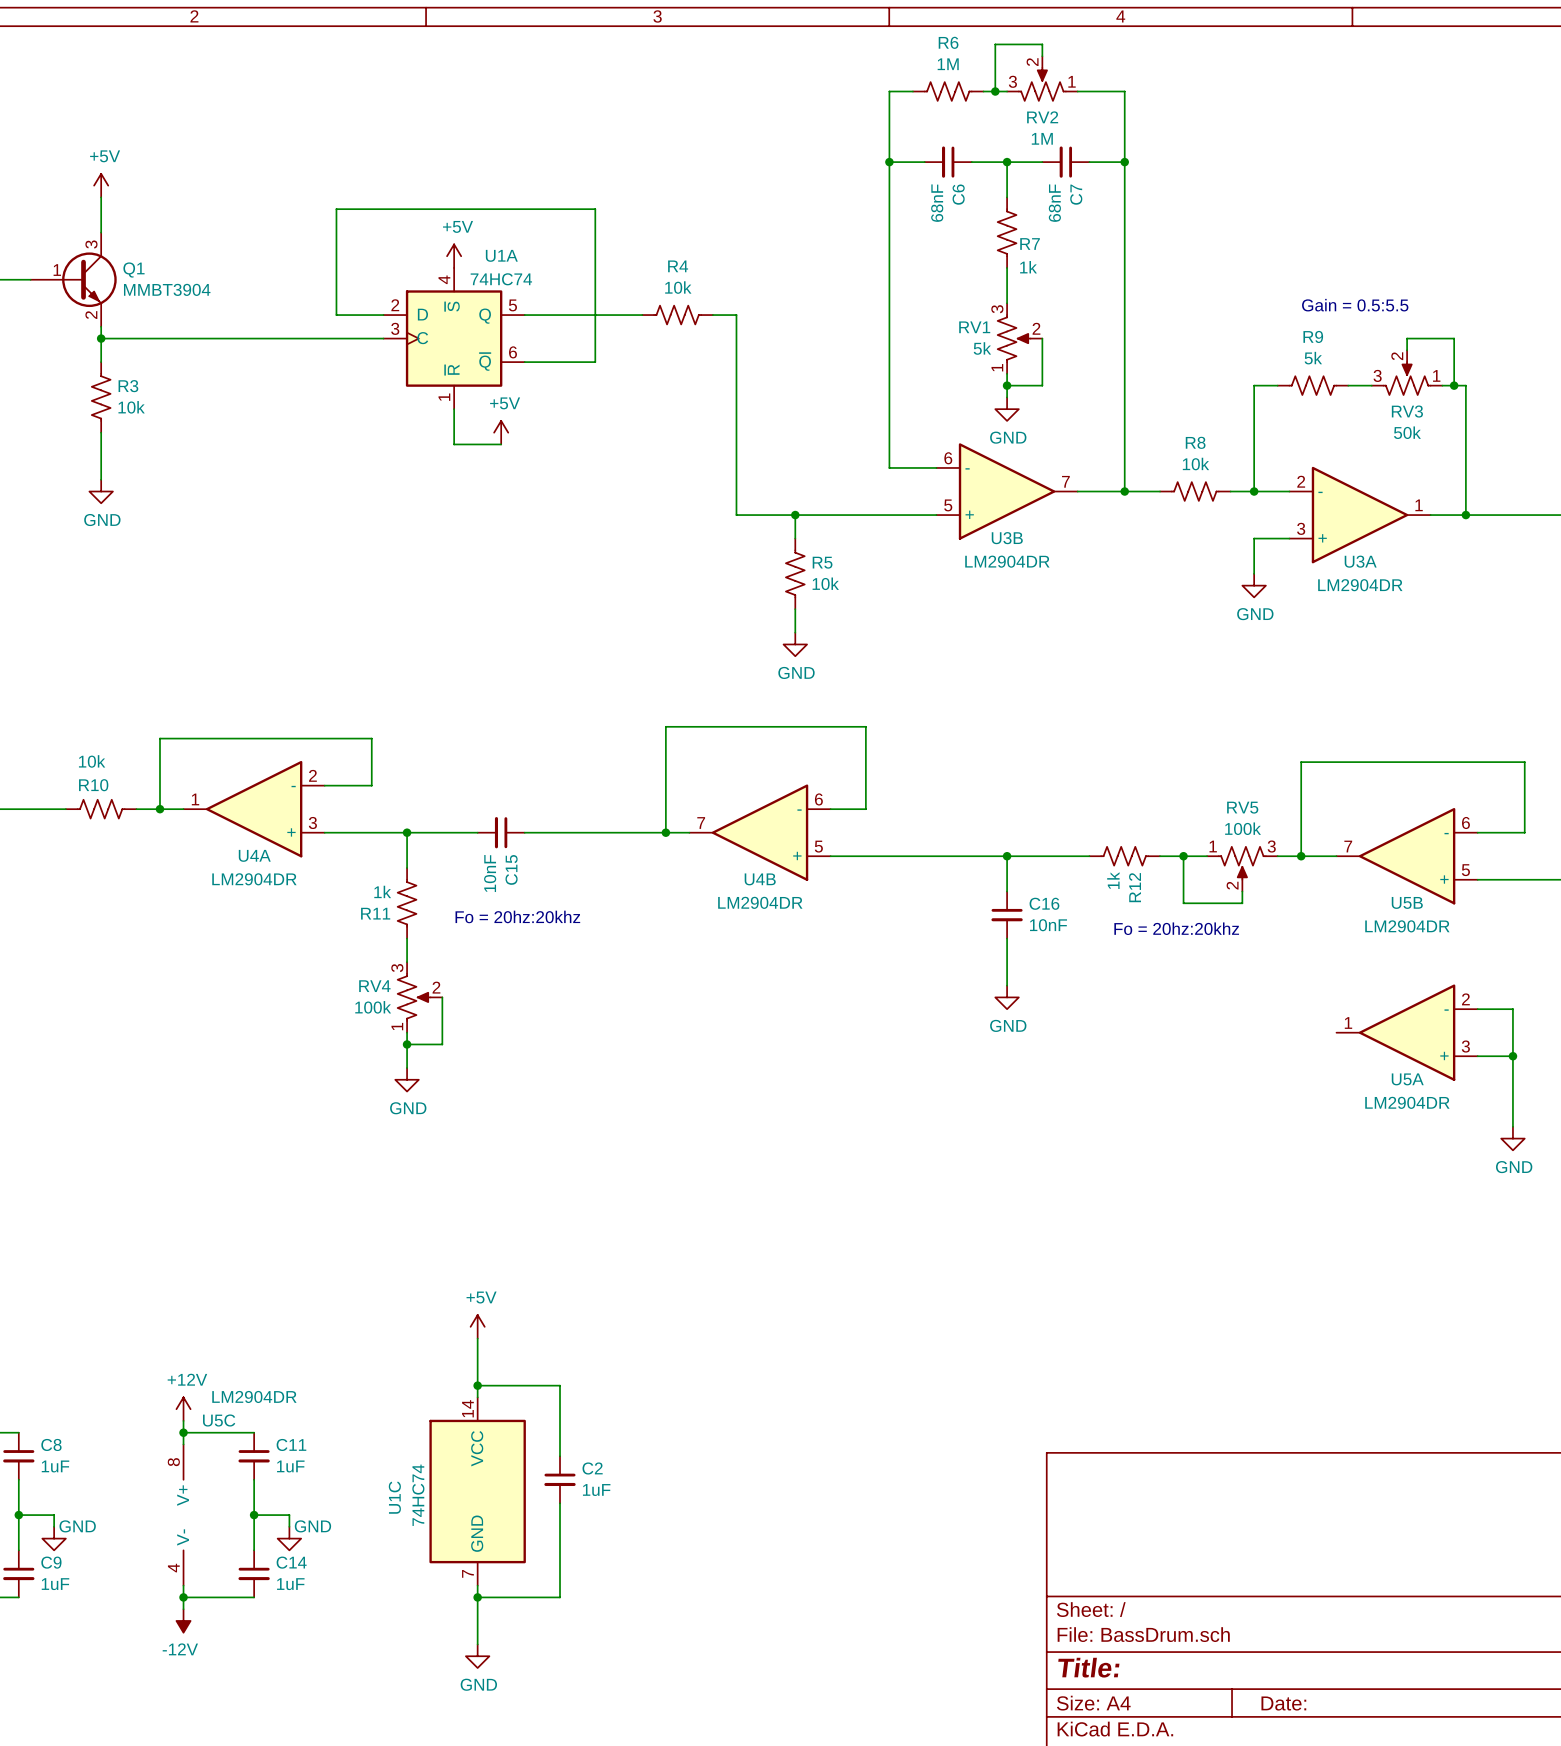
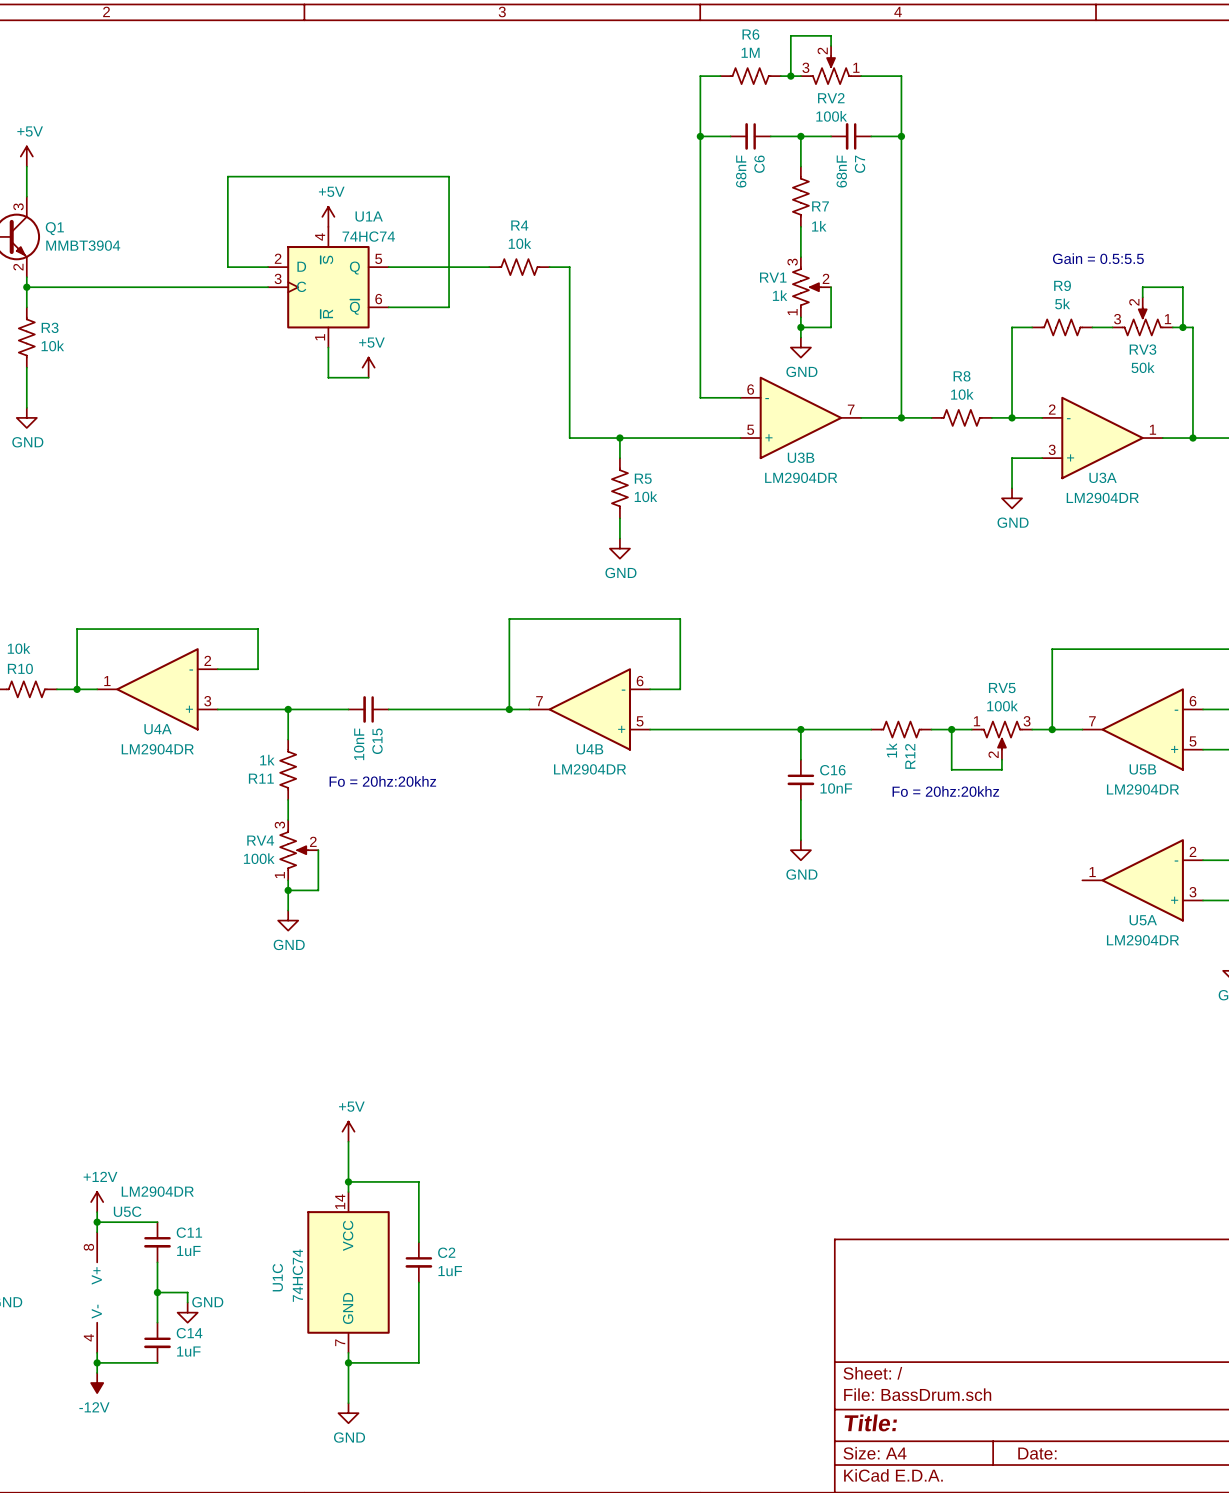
RV2 value: 1M (1042, 138) -> 100k (831, 116)
RV1 value: 5k (982, 348) -> 1k (780, 295)

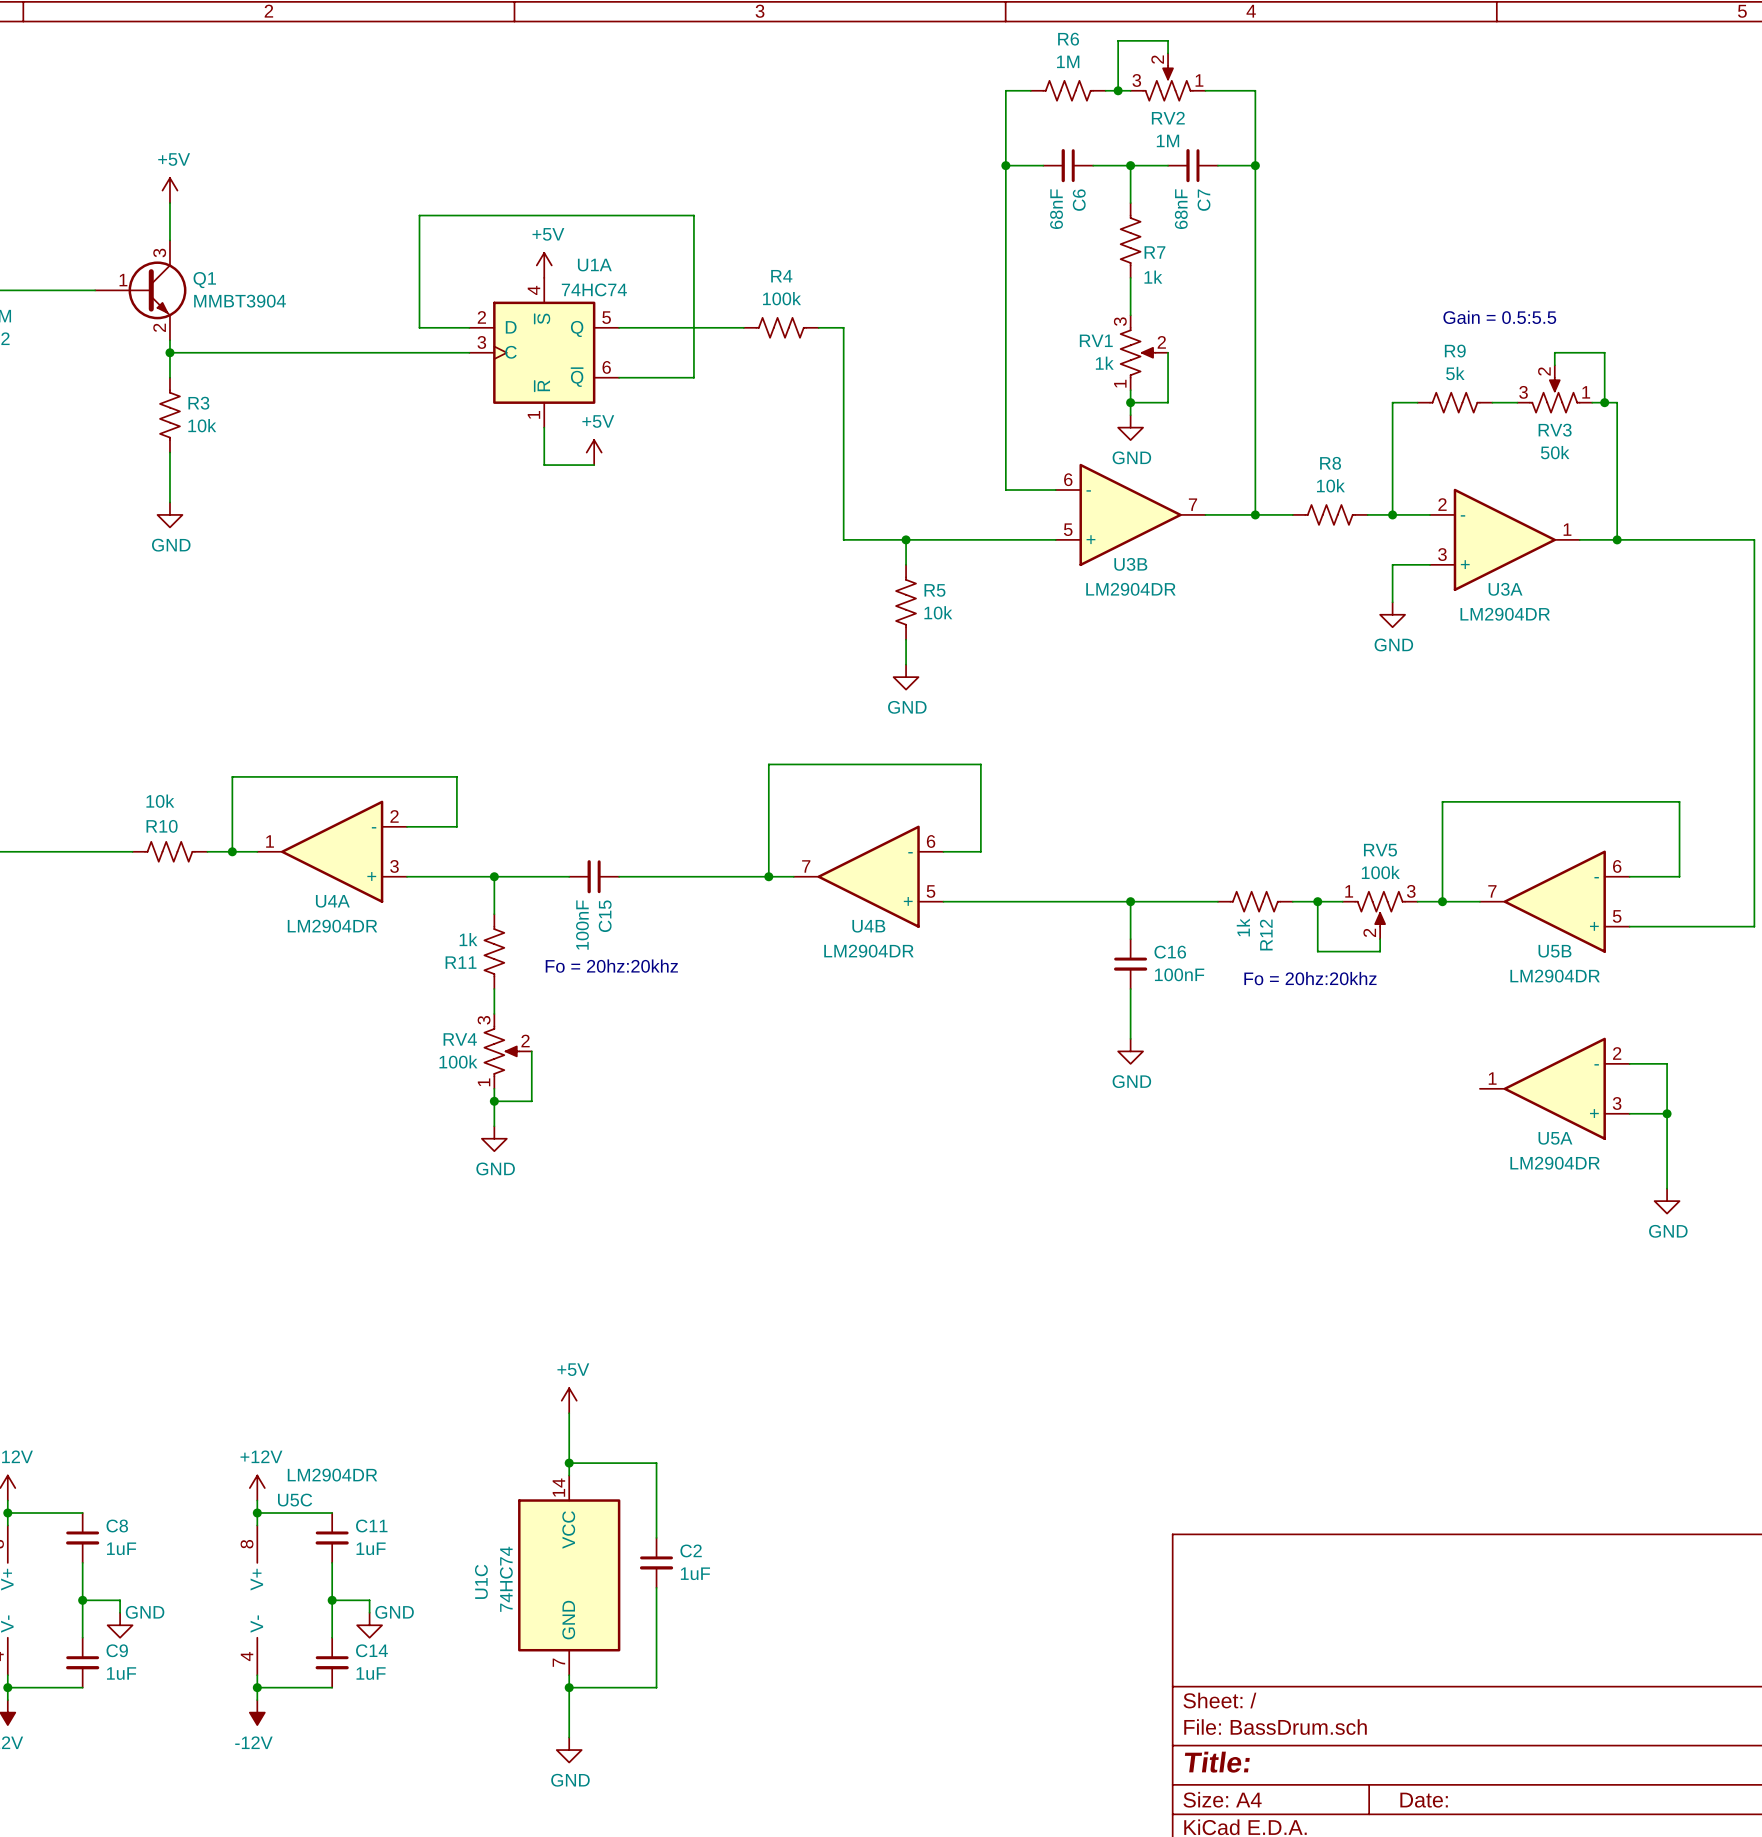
RV2 value: 100k (831, 116) -> 1M (1167, 140)
R4 value: 10k (519, 243) -> 100k (781, 298)
C15 value: 10nF (359, 744) -> 100nF (582, 925)
C16 value: 10nF (836, 788) -> 100nF (1179, 974)

